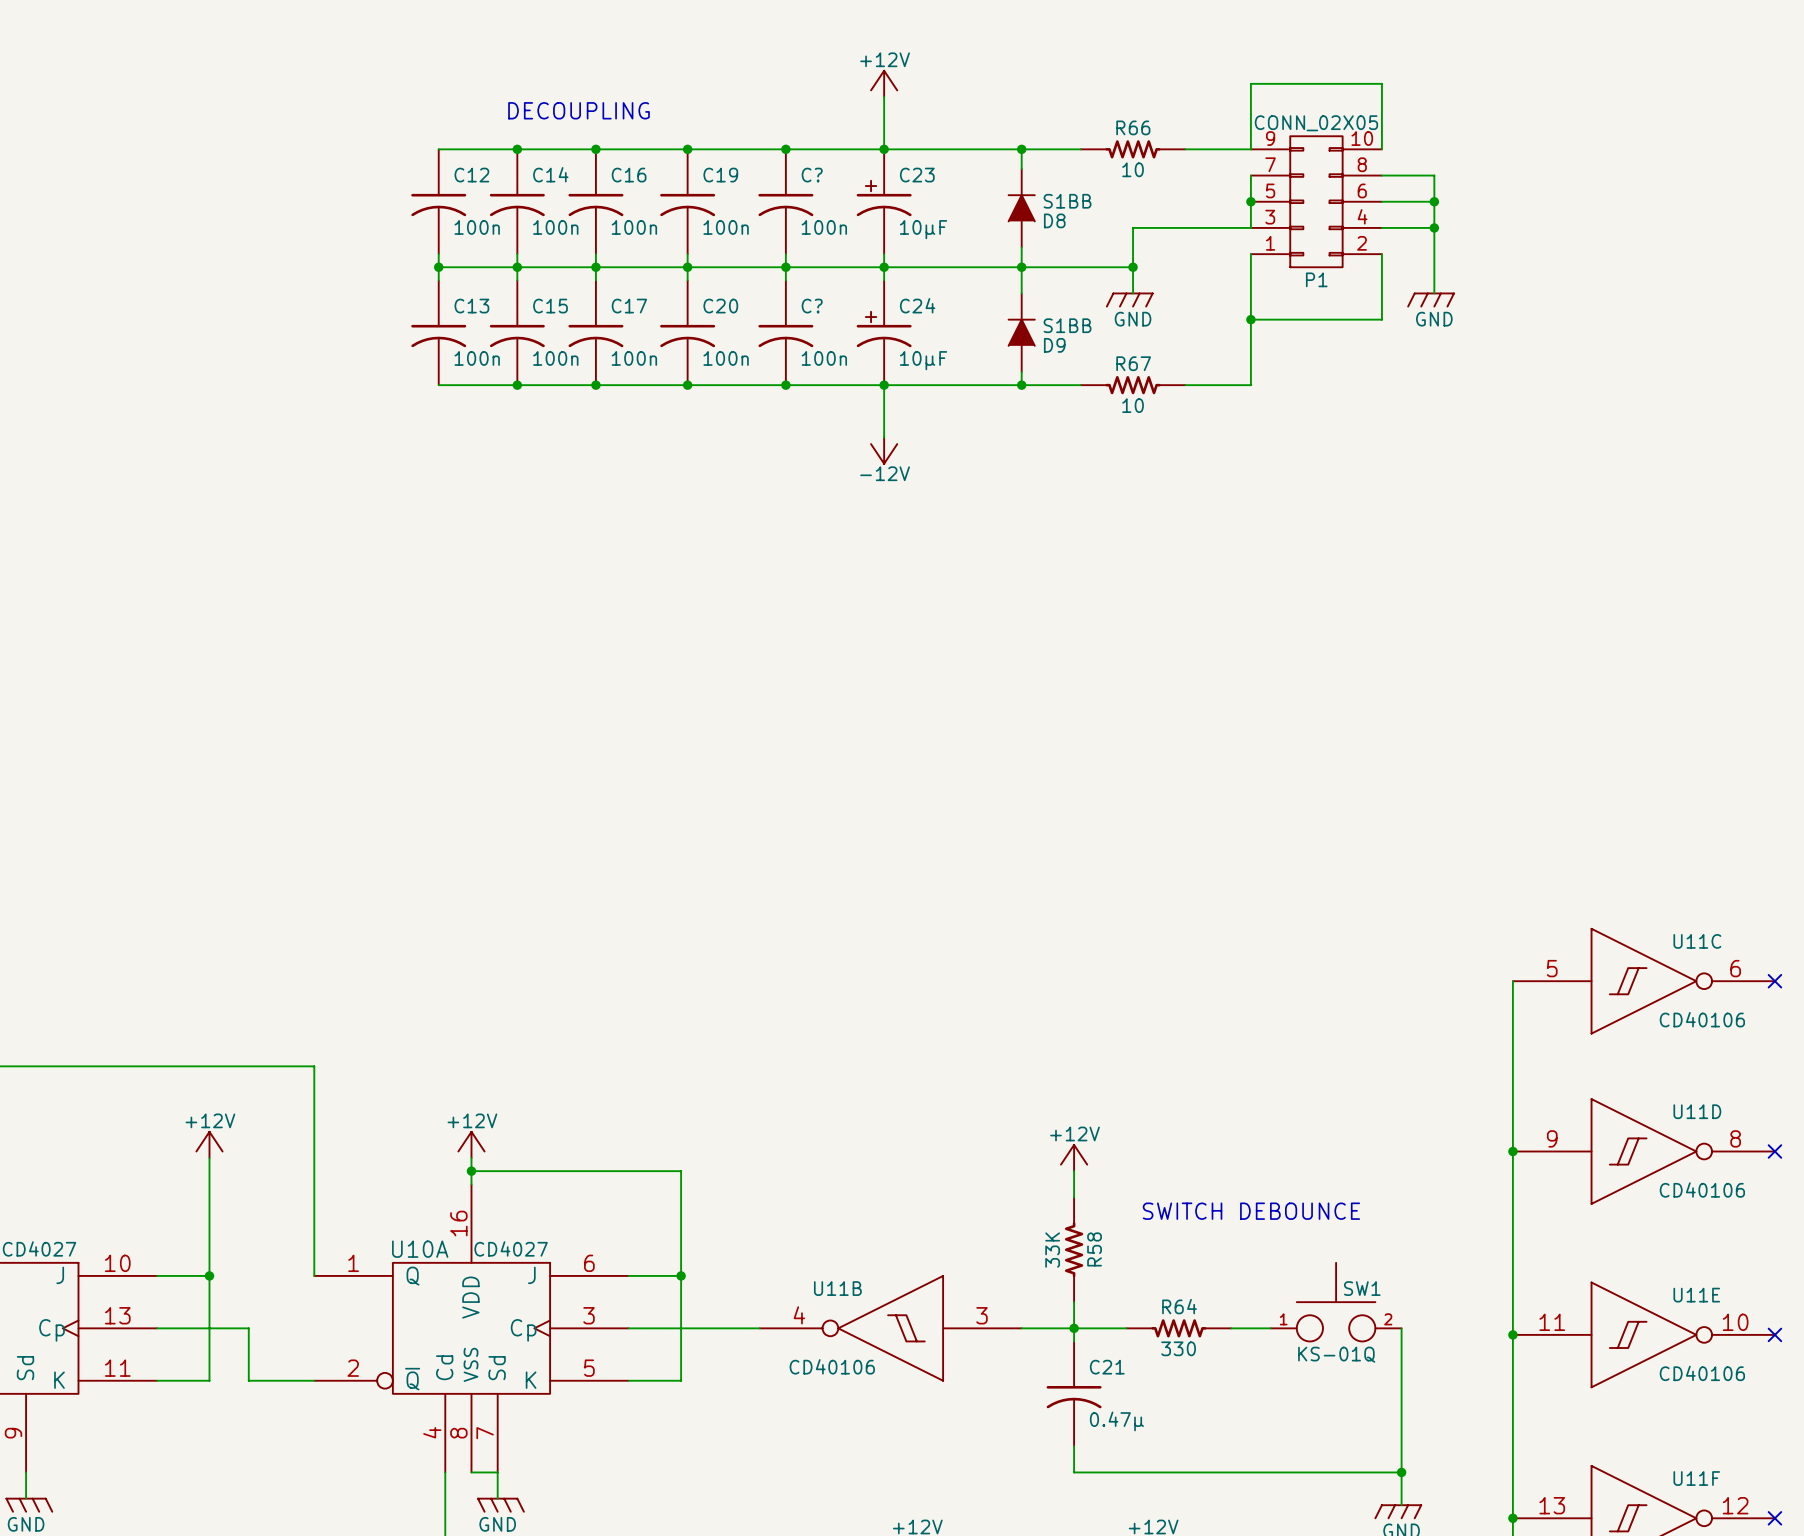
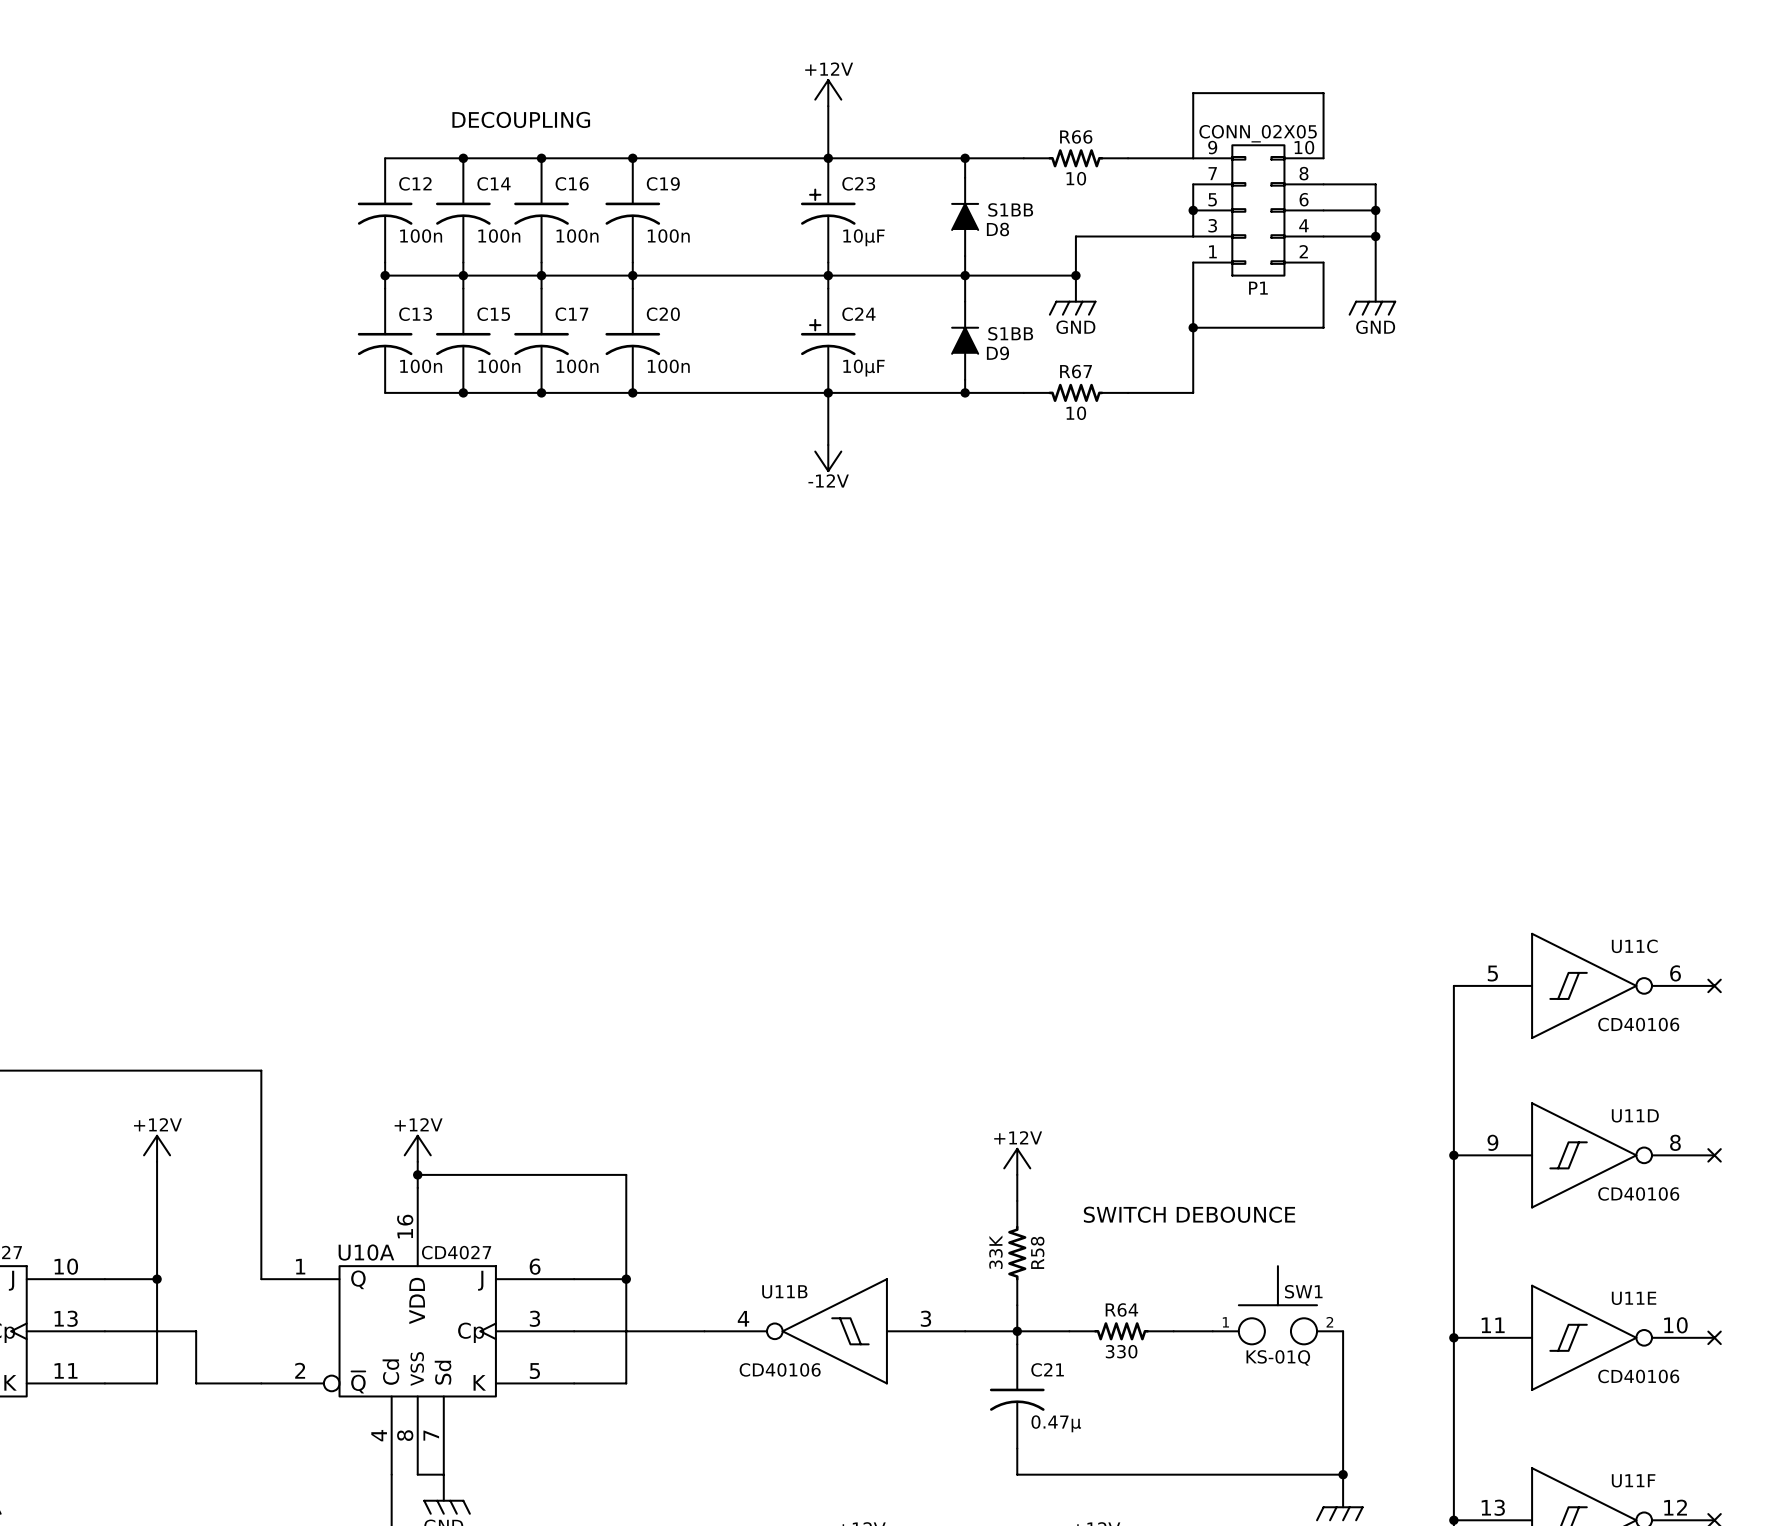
junction: (785, 149) -> none
C?: 100n (785, 201) -> none
wire: (785, 254) (785, 280) -> none
junction: (785, 267) -> none
C?: 100n (785, 332) -> none
junction: (785, 385) -> none

